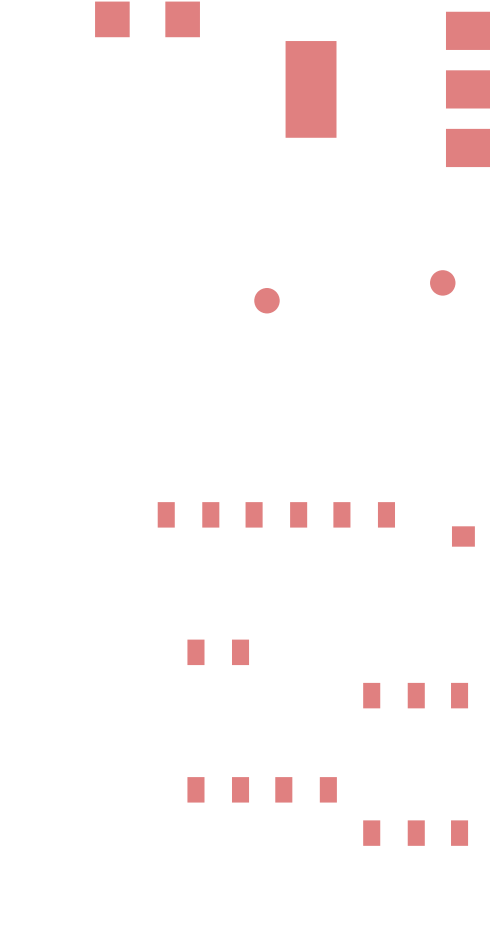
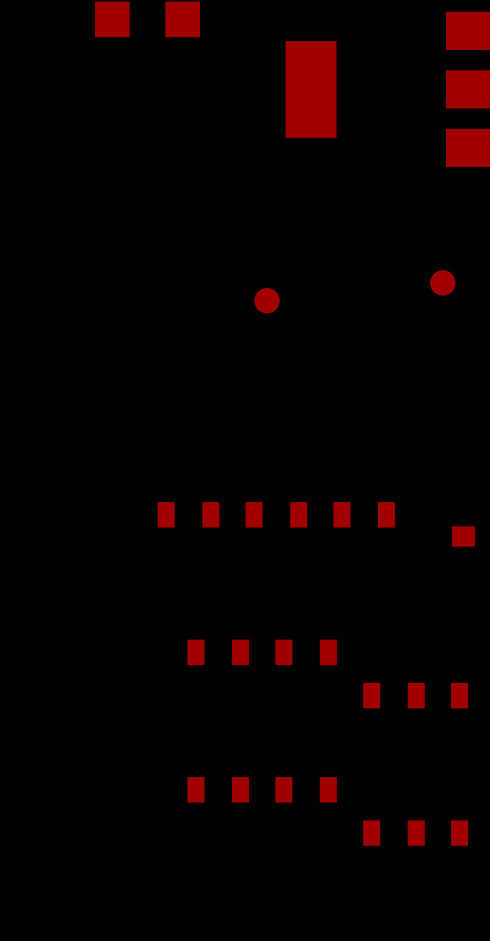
part: none -> (306, 652)

